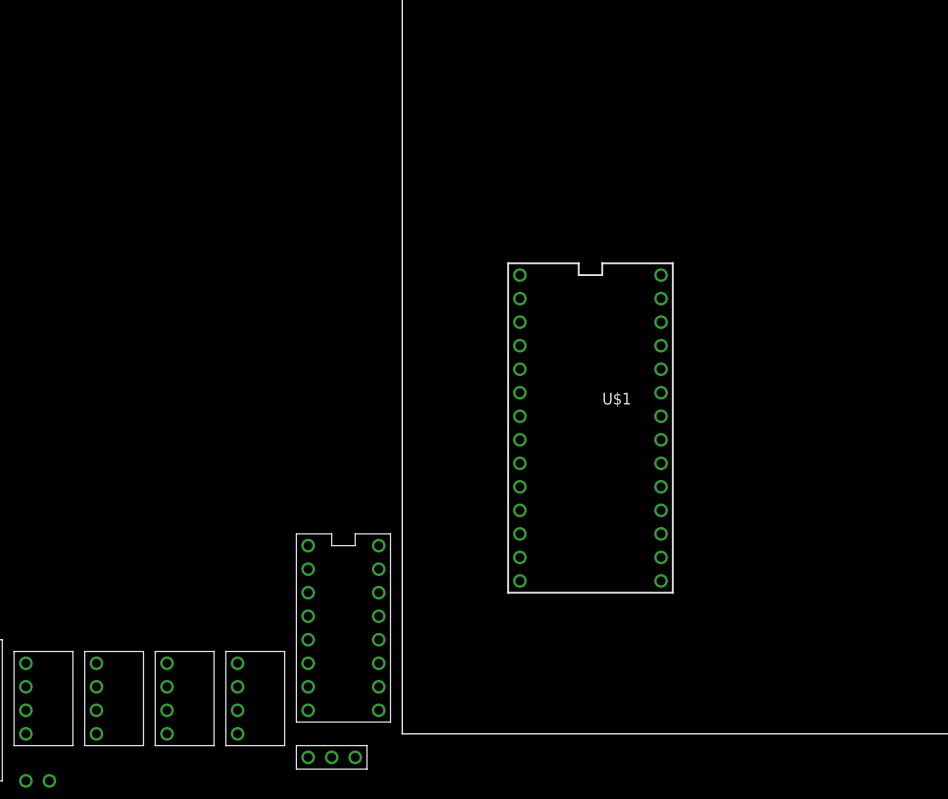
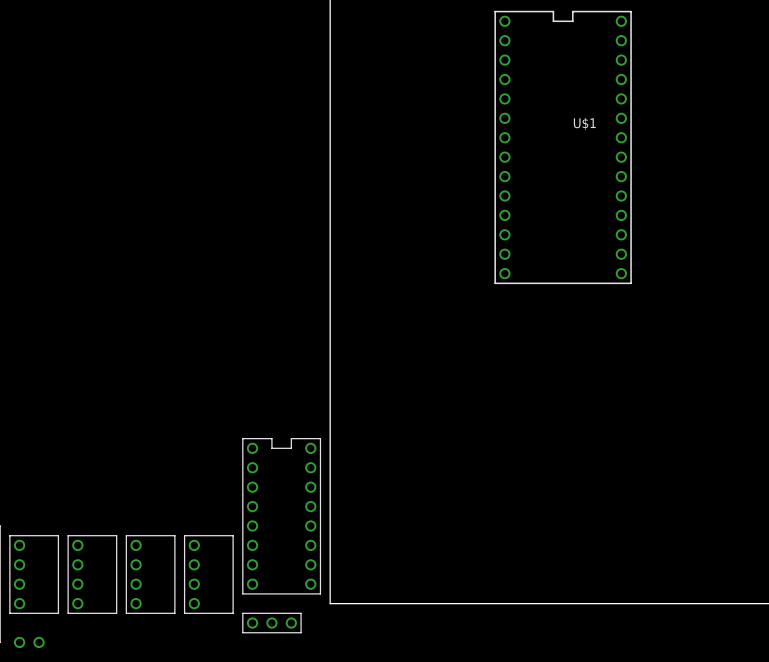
U$1 position: (590, 428) -> (563, 147)

